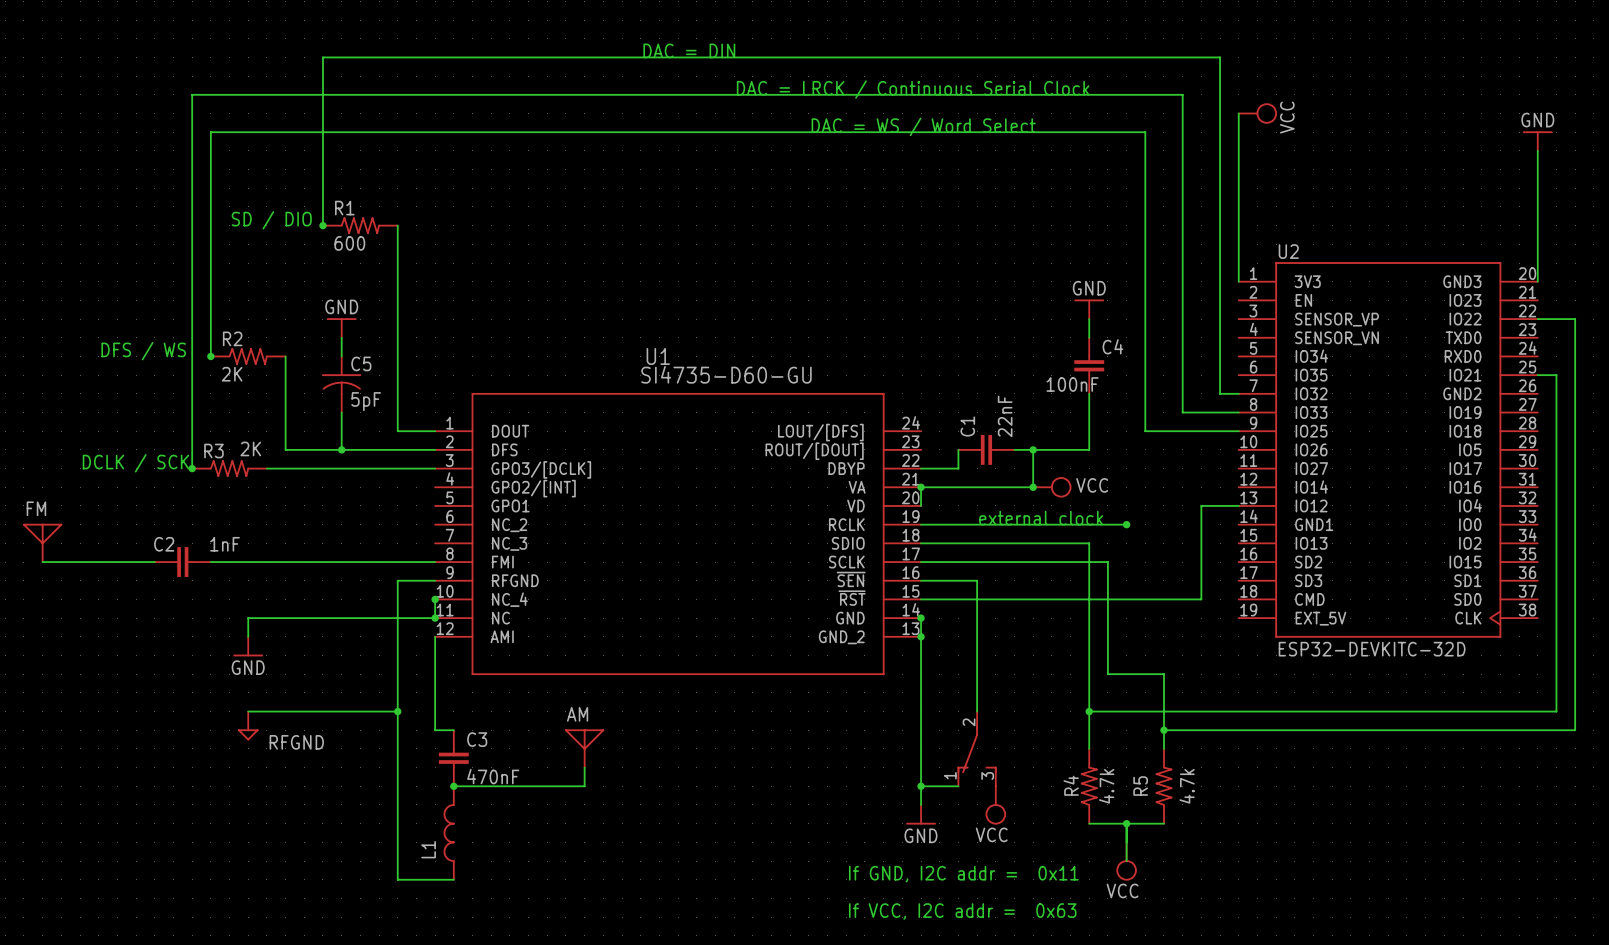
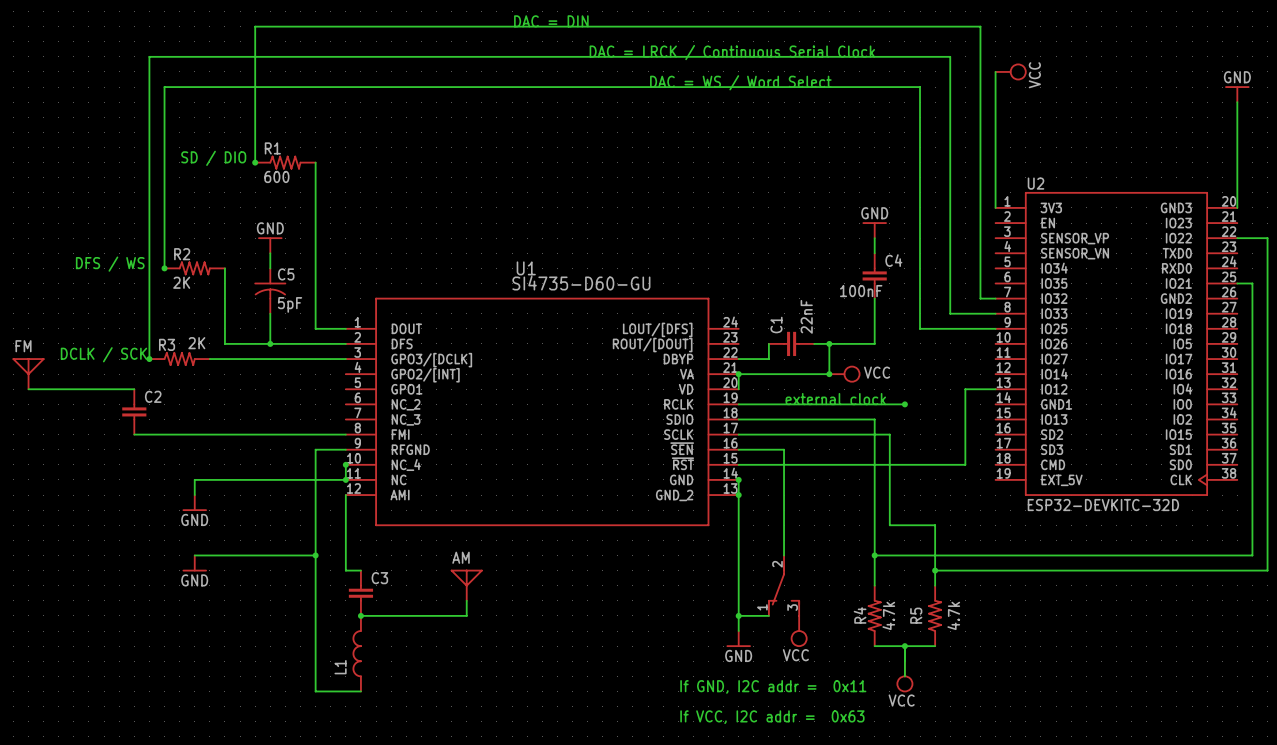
wire: none -> (28, 389) (134, 389)
FM position: (42, 542) -> (28, 373)
C2 value: 1nF (225, 544) -> none
wire: (42, 562) (154, 562) -> none
C2 rotation: 0° (182, 562) -> 90° clockwise (134, 411)
power symbol shape: [237, 711, 259, 741] -> [182, 555, 207, 572]
power symbol text: none -> GND (194, 580)
power symbol text: RFGND (296, 742) -> none
C3 value: 470nF (493, 776) -> none

